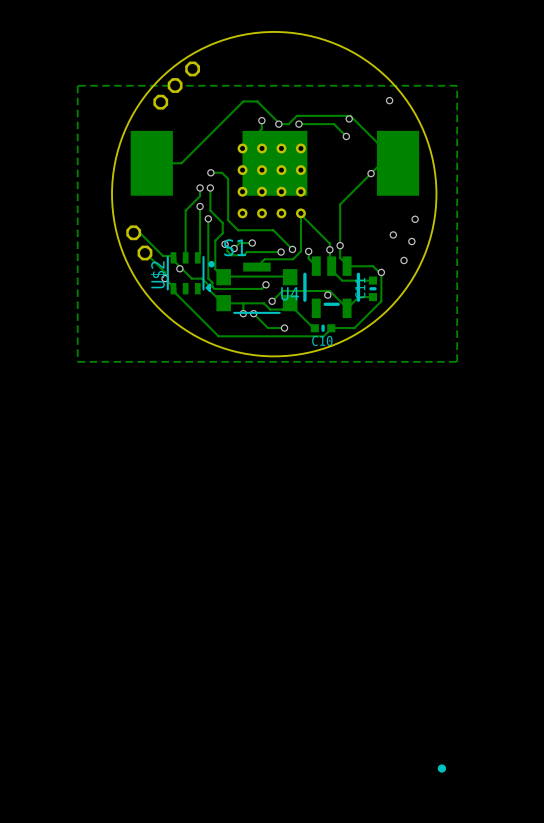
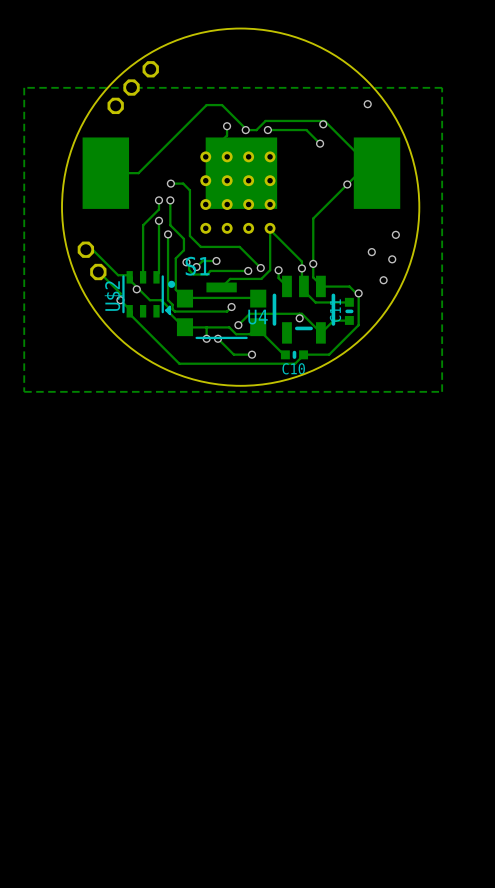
part: (441, 768) -> none

